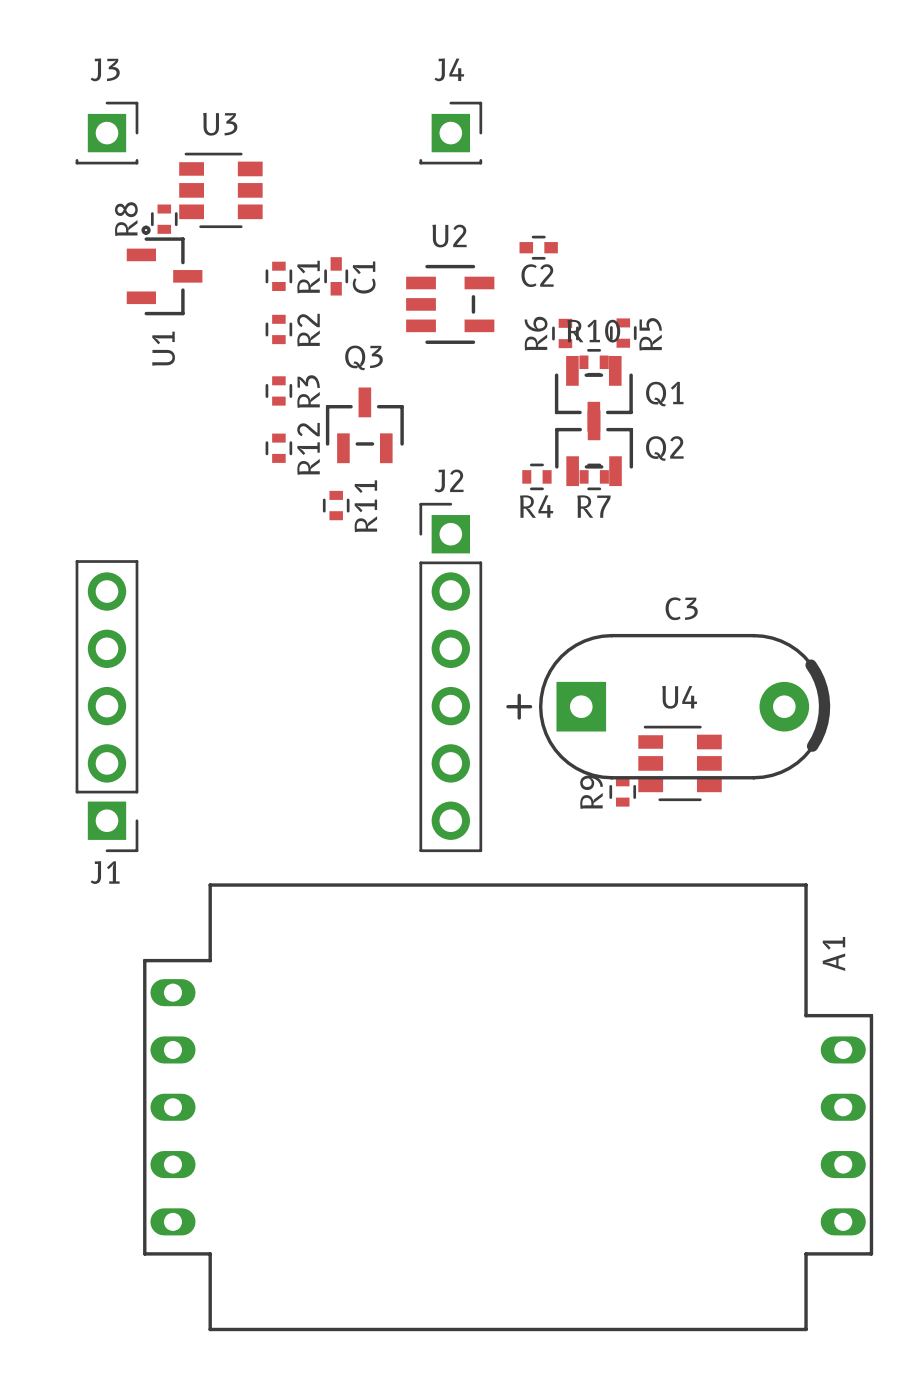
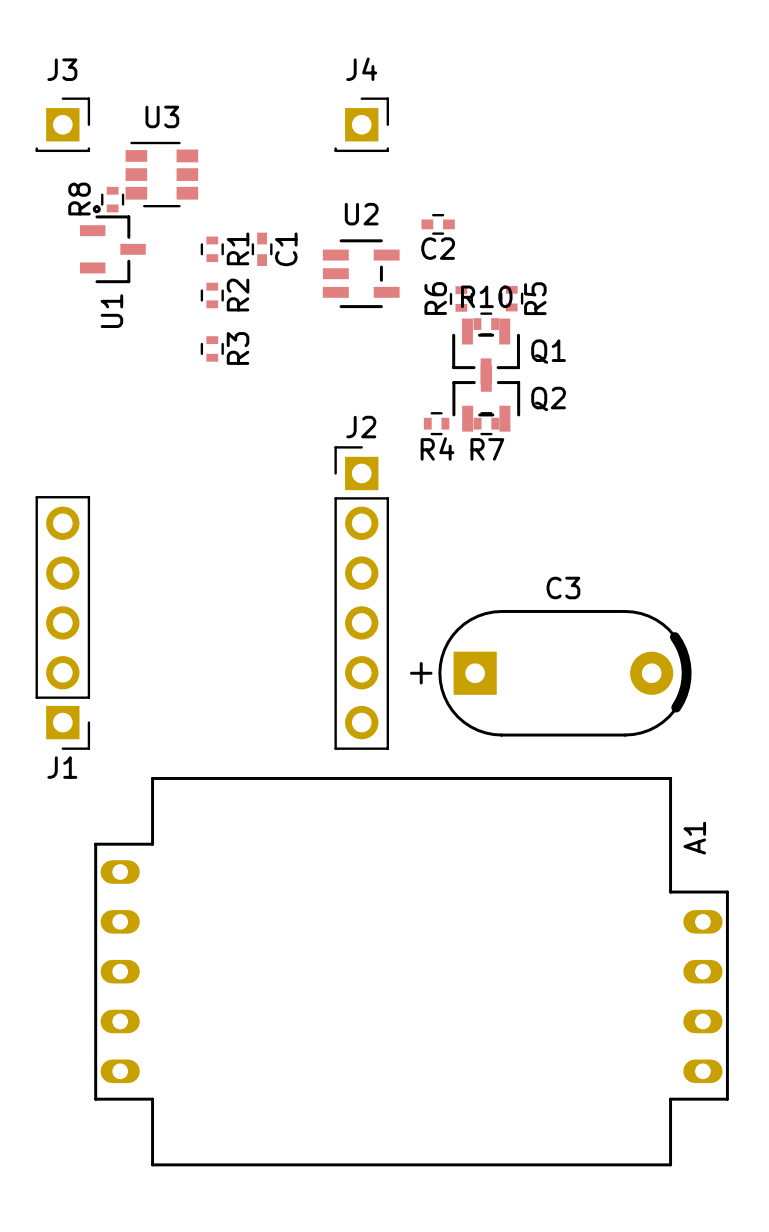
Q3: (364, 425) -> none
R12: (278, 448) -> none
R11: (336, 505) -> none
C3 position: (668, 706) -> (550, 673)
U4: (680, 763) -> none
R9: (622, 791) -> none

